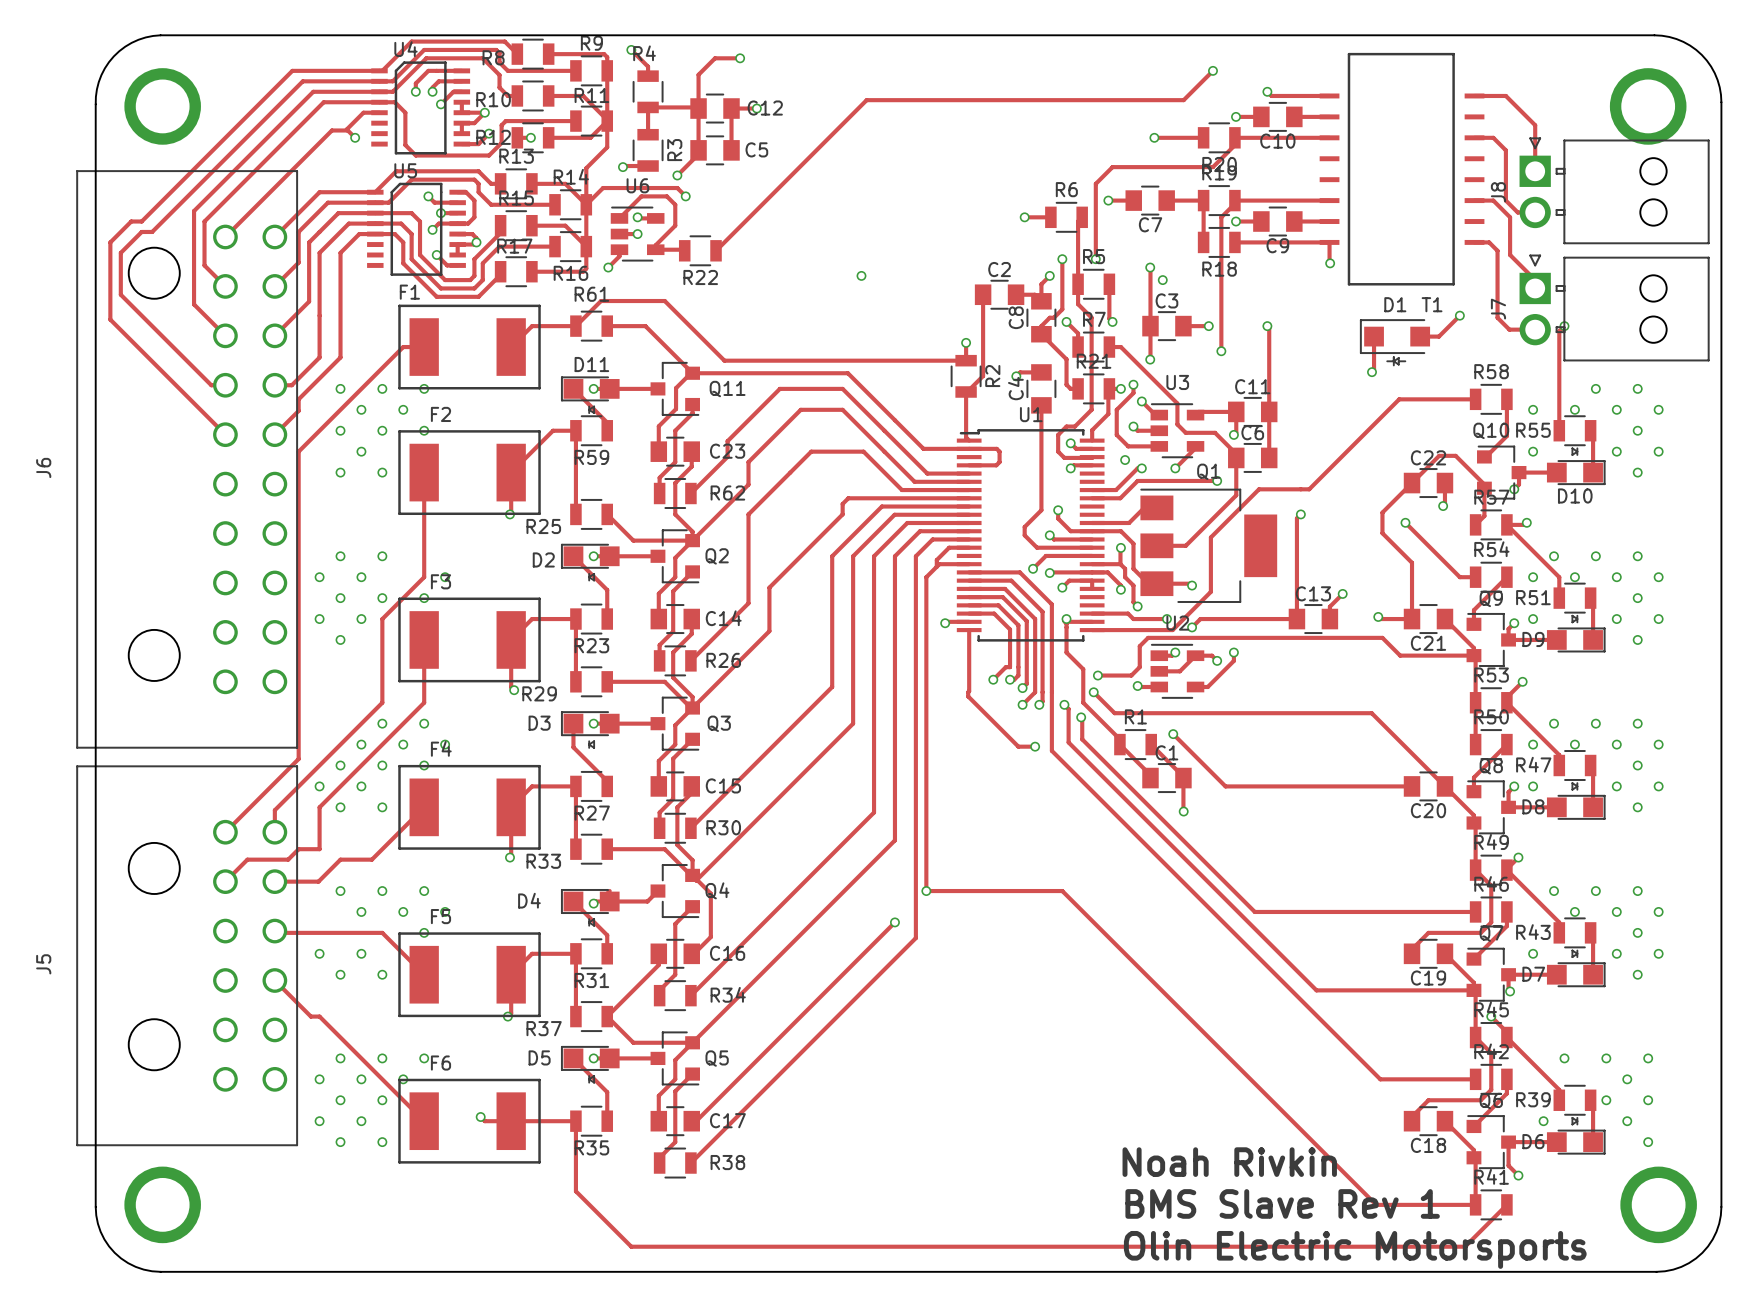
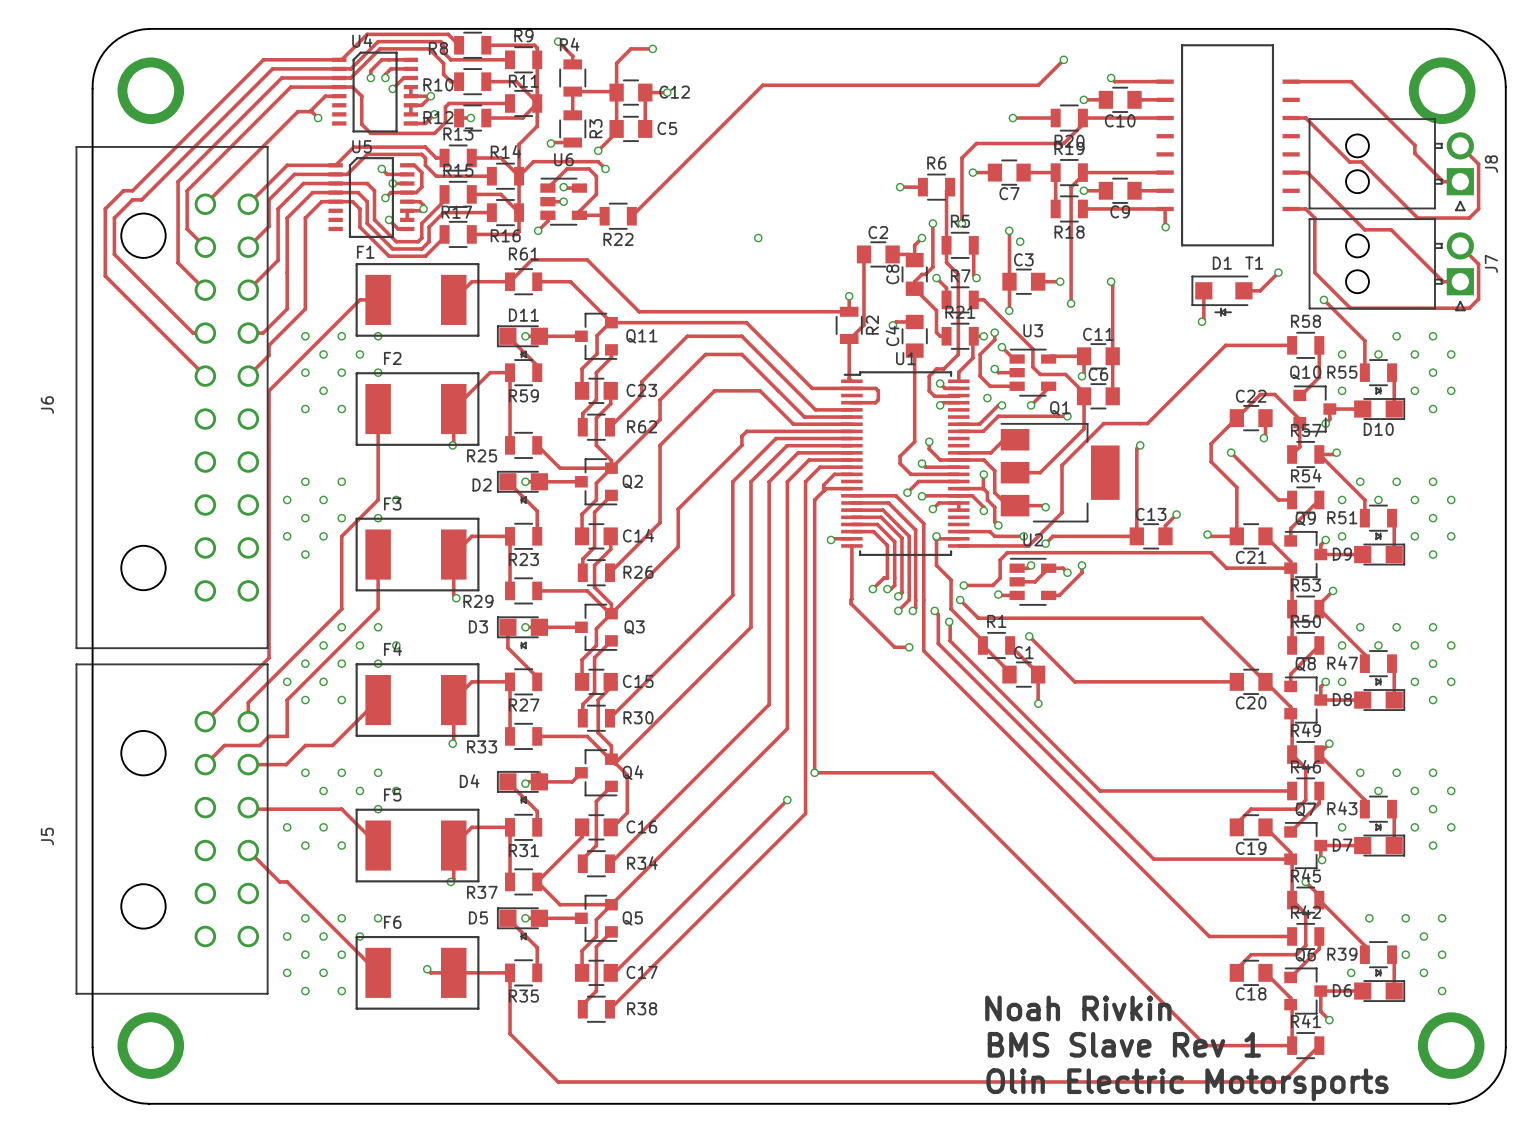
track: (1505, 95) (1535, 125) (1535, 171) -> (1318, 81) (1351, 81) (1414, 145) (1414, 153) (1443, 181) (1460, 181)
track: (1491, 137) (1505, 150) (1505, 200) (1517, 212) (1535, 212) -> (1305, 118) (1349, 161) (1361, 161) (1417, 218) (1469, 218) (1478, 208) (1478, 164) (1460, 145)
J8 rotation: 0° (1614, 190) -> 180° (1391, 164)
track: (1510, 217) (1510, 254) (1535, 280) (1535, 288) -> (1322, 187) (1364, 229) (1391, 229) (1443, 281) (1460, 281)
track: (1489, 242) (1497, 250) (1497, 317) (1509, 329) (1535, 329) -> (1303, 208) (1314, 218) (1314, 272) (1350, 308) (1469, 308) (1478, 299) (1478, 264) (1460, 245)
J7 rotation: 0° (1614, 307) -> 180° (1391, 264)
track: (1564, 326) (1559, 331) (1559, 394) -> (1323, 299) (1364, 340)
via position: (1564, 326) -> (1323, 299)

